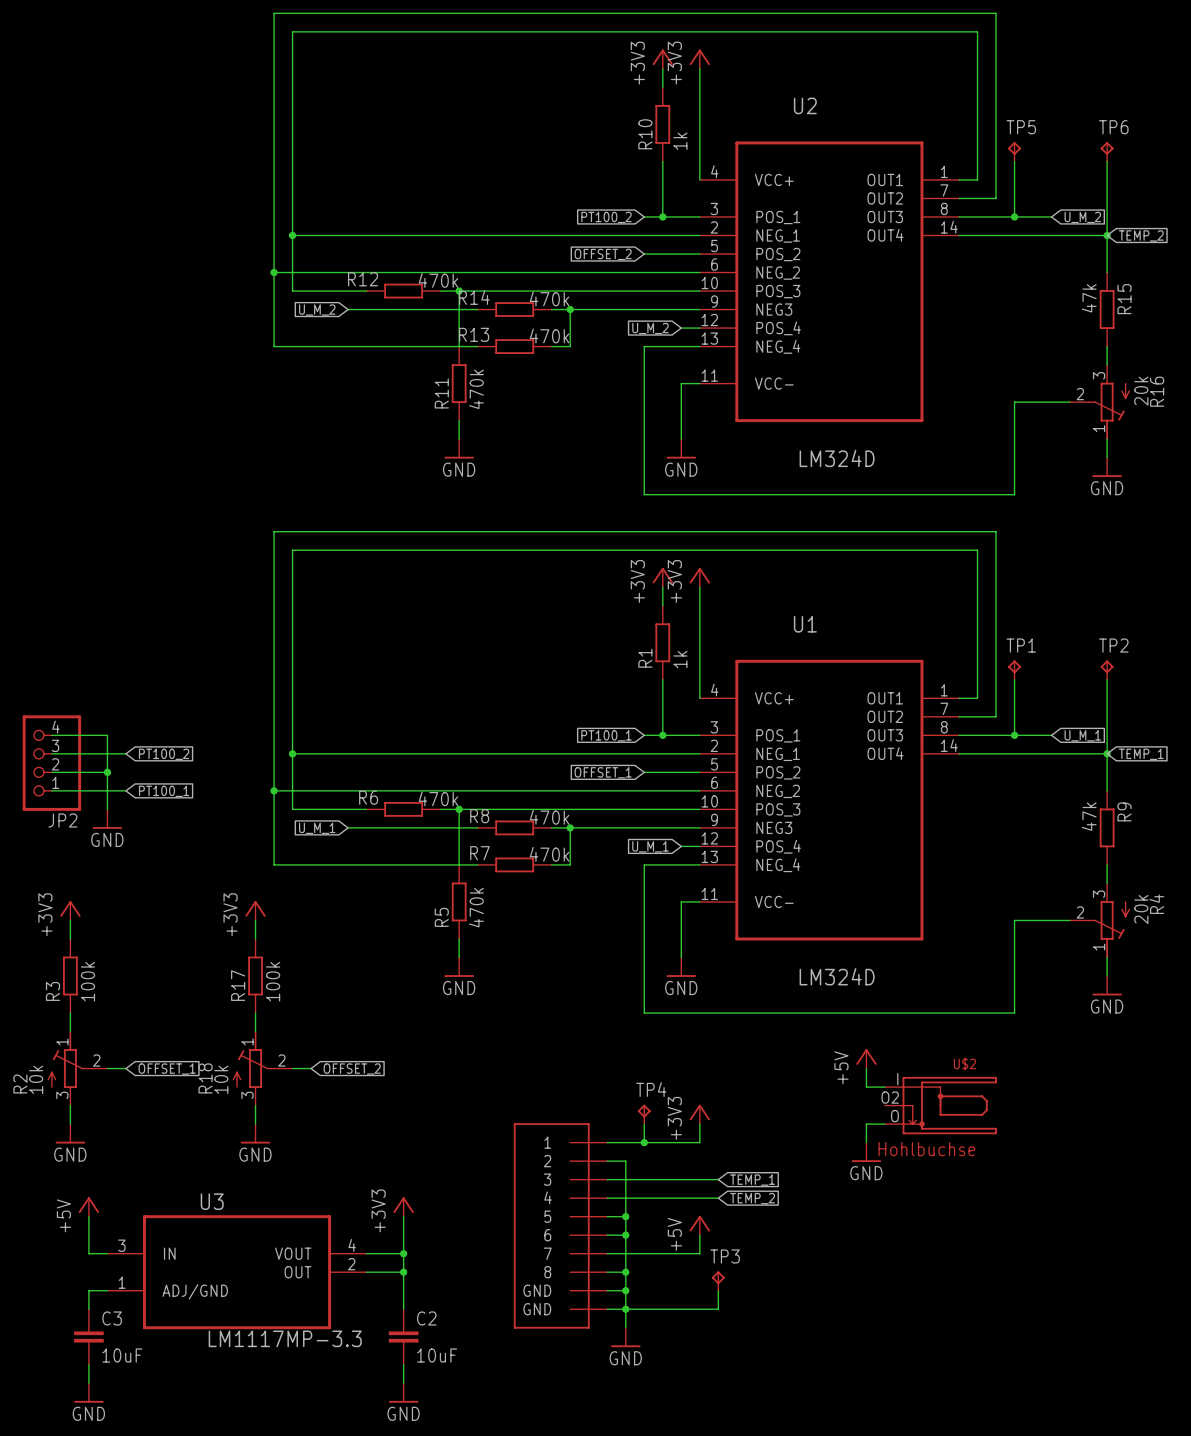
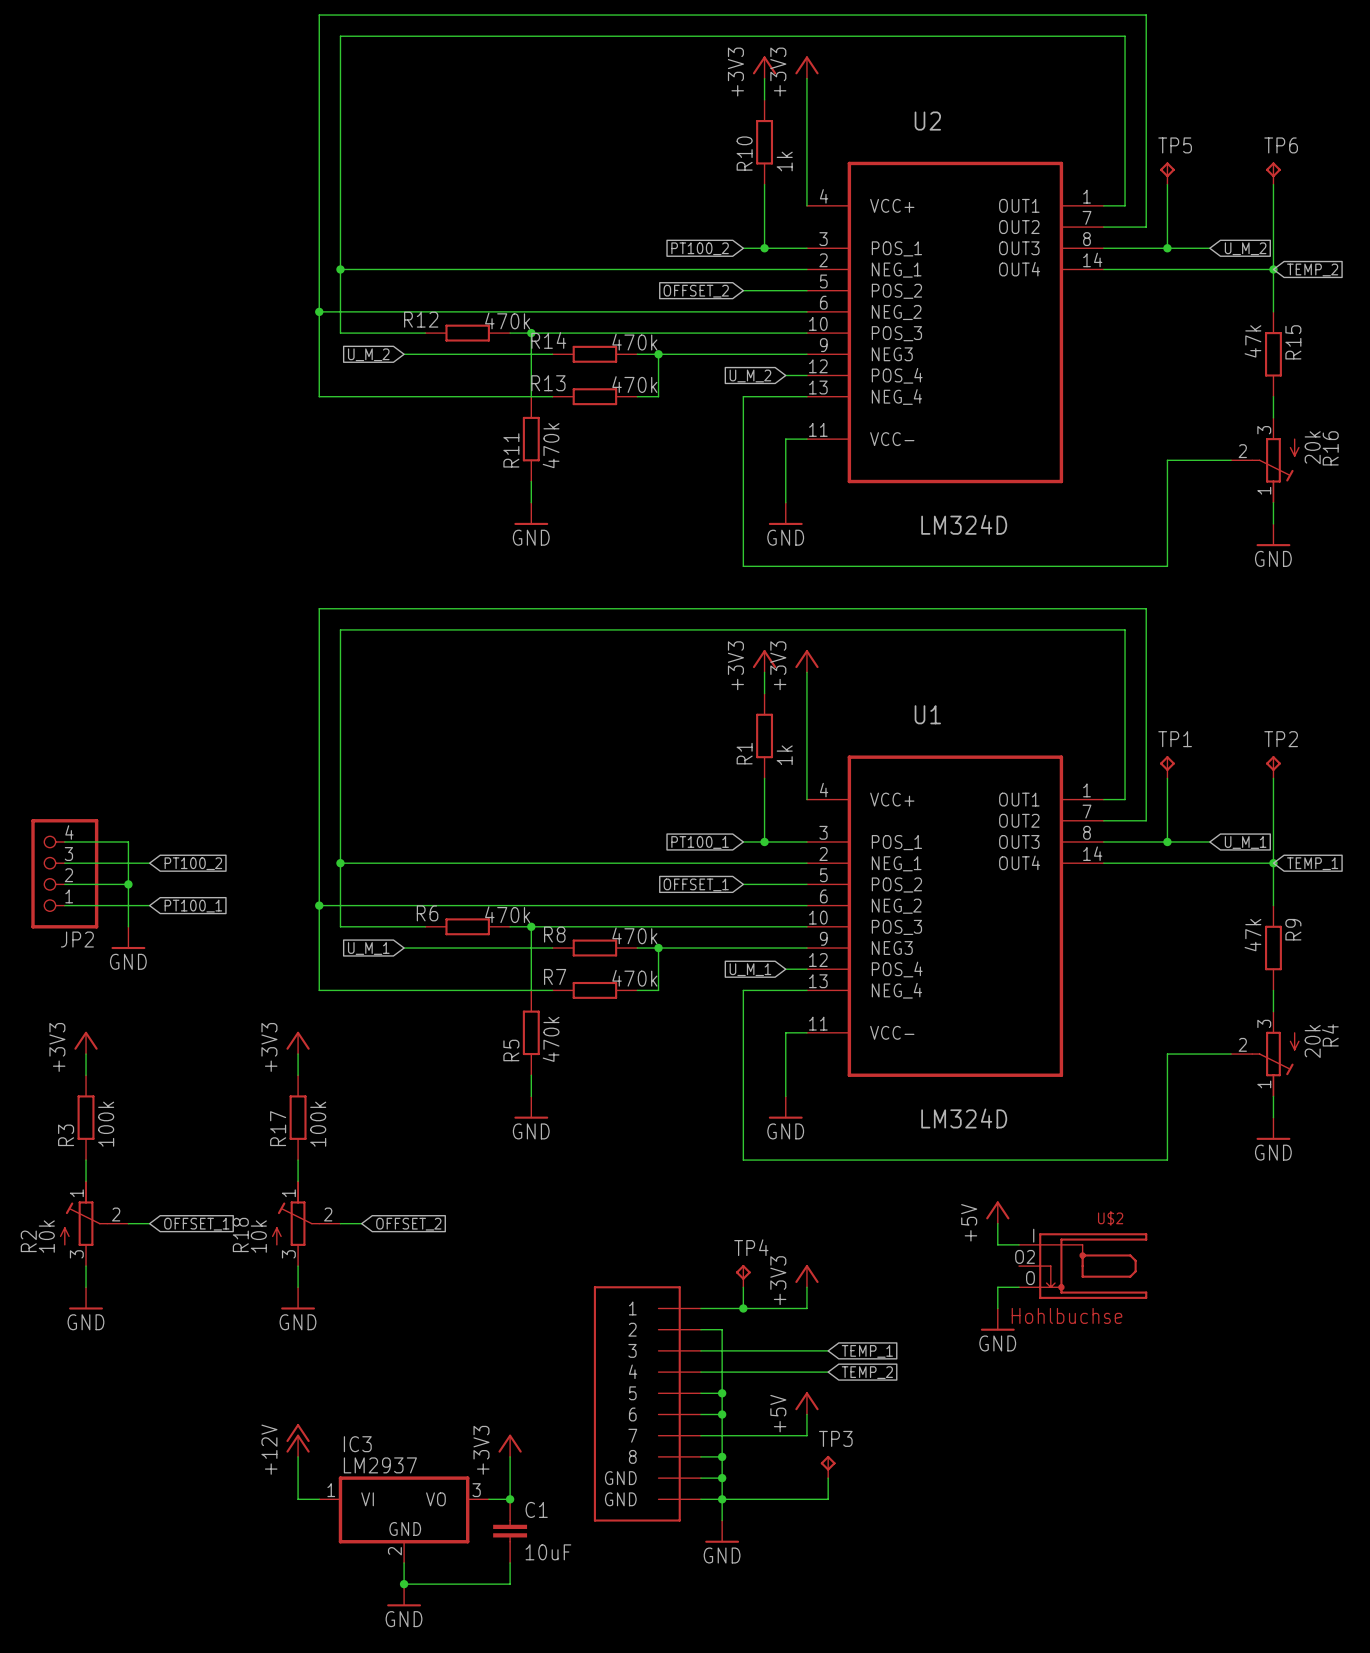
power symbol: +5V (88, 1206) -> none
power symbol position: +3V3 (403, 1206) -> +3V3 (510, 1445)
wire: (88, 1216) (88, 1253) (107, 1253) -> (298, 1456) (298, 1499) (319, 1499)
wire: (403, 1216) (403, 1309) -> none
wire: (366, 1253) (403, 1253) -> none
junction: (403, 1253) -> none
power symbol: none -> +12V (298, 1440)
U3: LM1117MP-3.3 (237, 1272) -> none
wire: (366, 1272) (403, 1272) -> none
junction: (403, 1272) -> none
wire: none -> (510, 1456) (510, 1499) (488, 1499)
wire: (107, 1290) (88, 1290) (88, 1309) -> none
junction: none -> (510, 1499)
IC3: none -> LM2937 (404, 1519)
C3: 10uF (88, 1337) -> none
C2: 10uF (403, 1337) -> none
C1: none -> 10uF (510, 1531)
wire: (88, 1364) (88, 1383) -> none
wire: none -> (404, 1562) (404, 1584) (510, 1584) (510, 1562)
wire: (403, 1364) (403, 1383) -> none
junction: none -> (404, 1584)
power symbol: GND (88, 1393) -> none
power symbol position: GND (403, 1393) -> GND (404, 1595)

